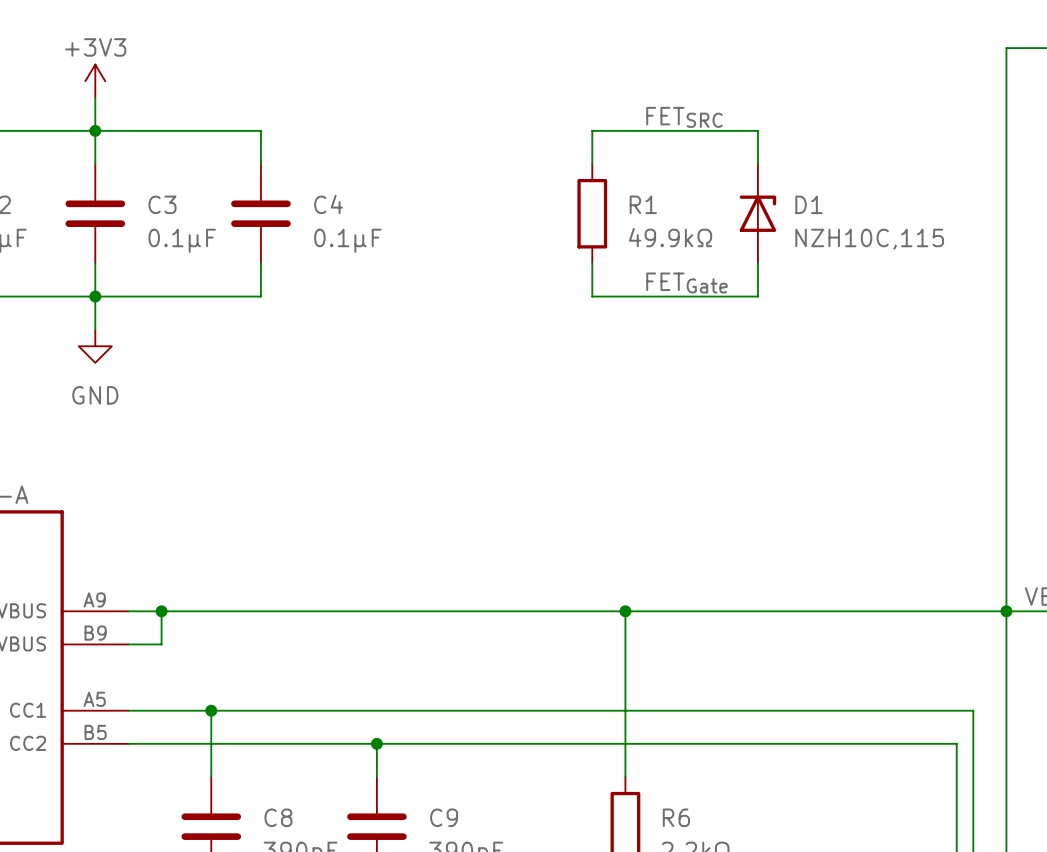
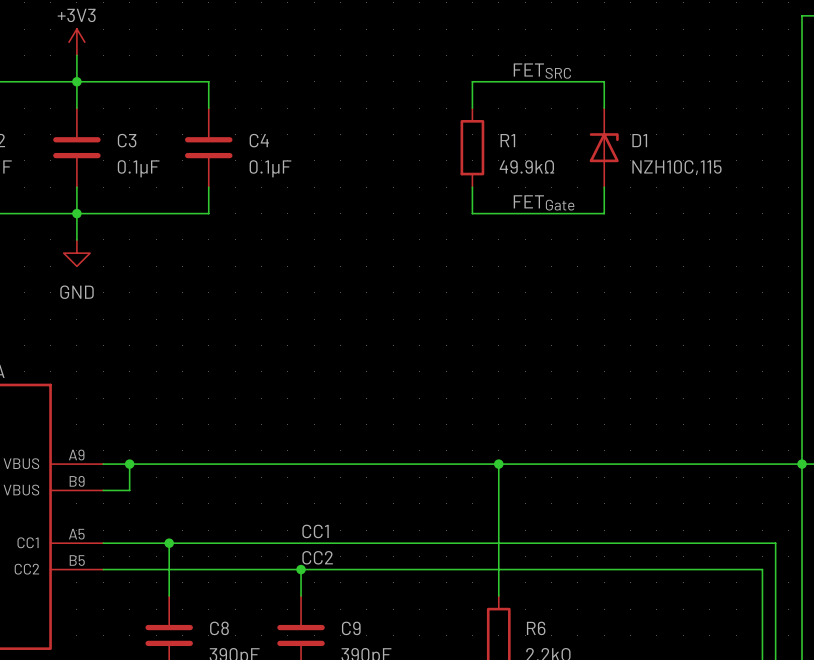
label: none -> CC1 (315, 531)
label: none -> CC2 (317, 557)

